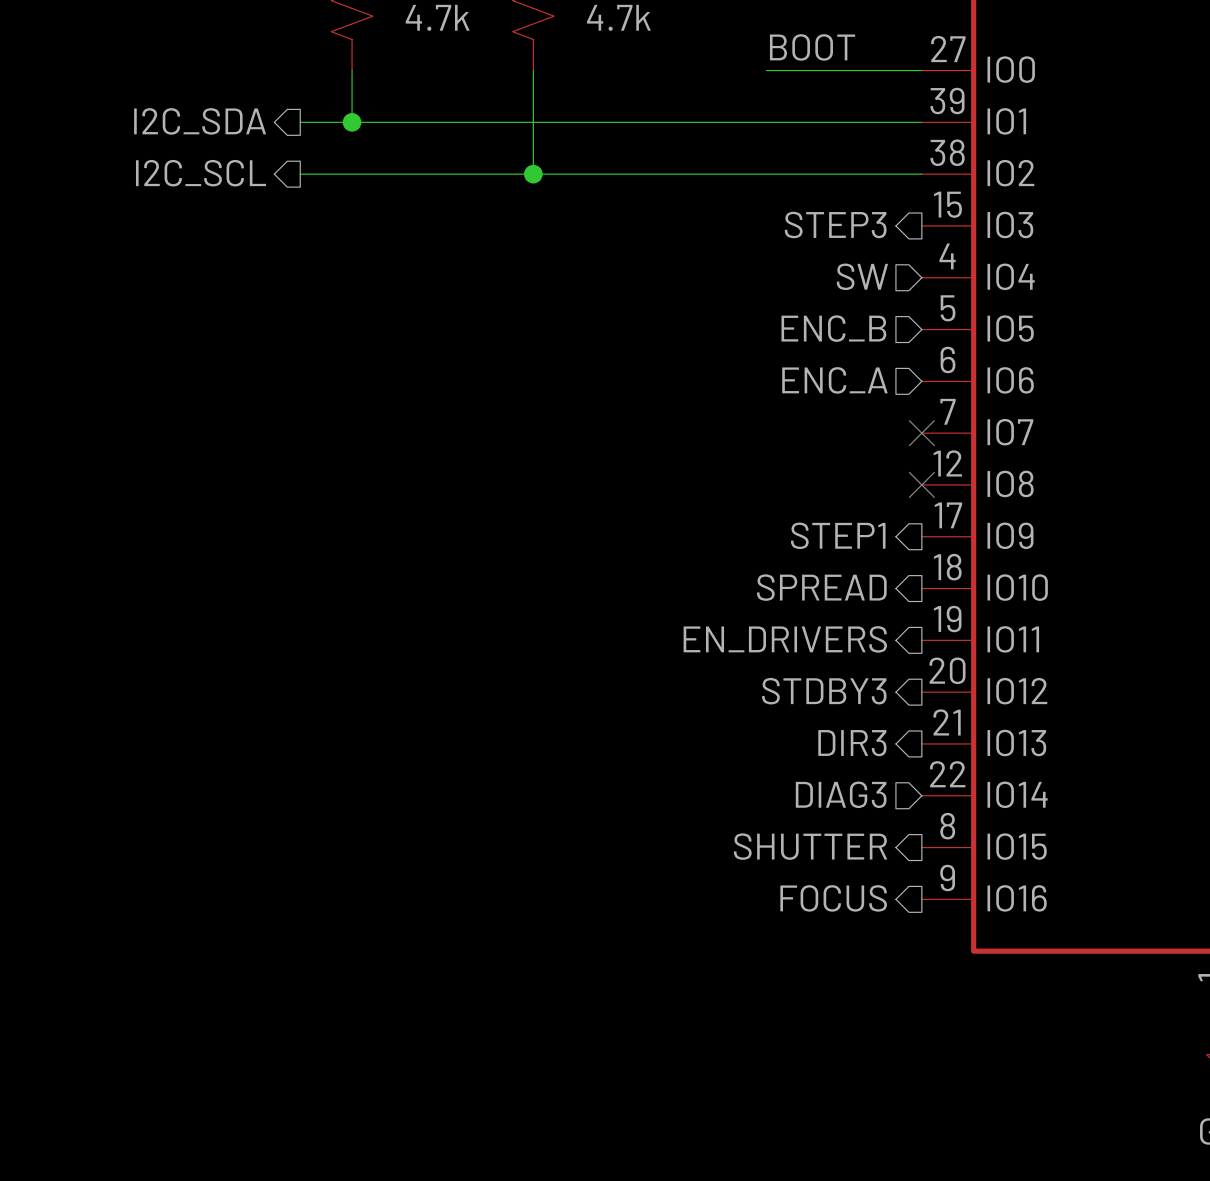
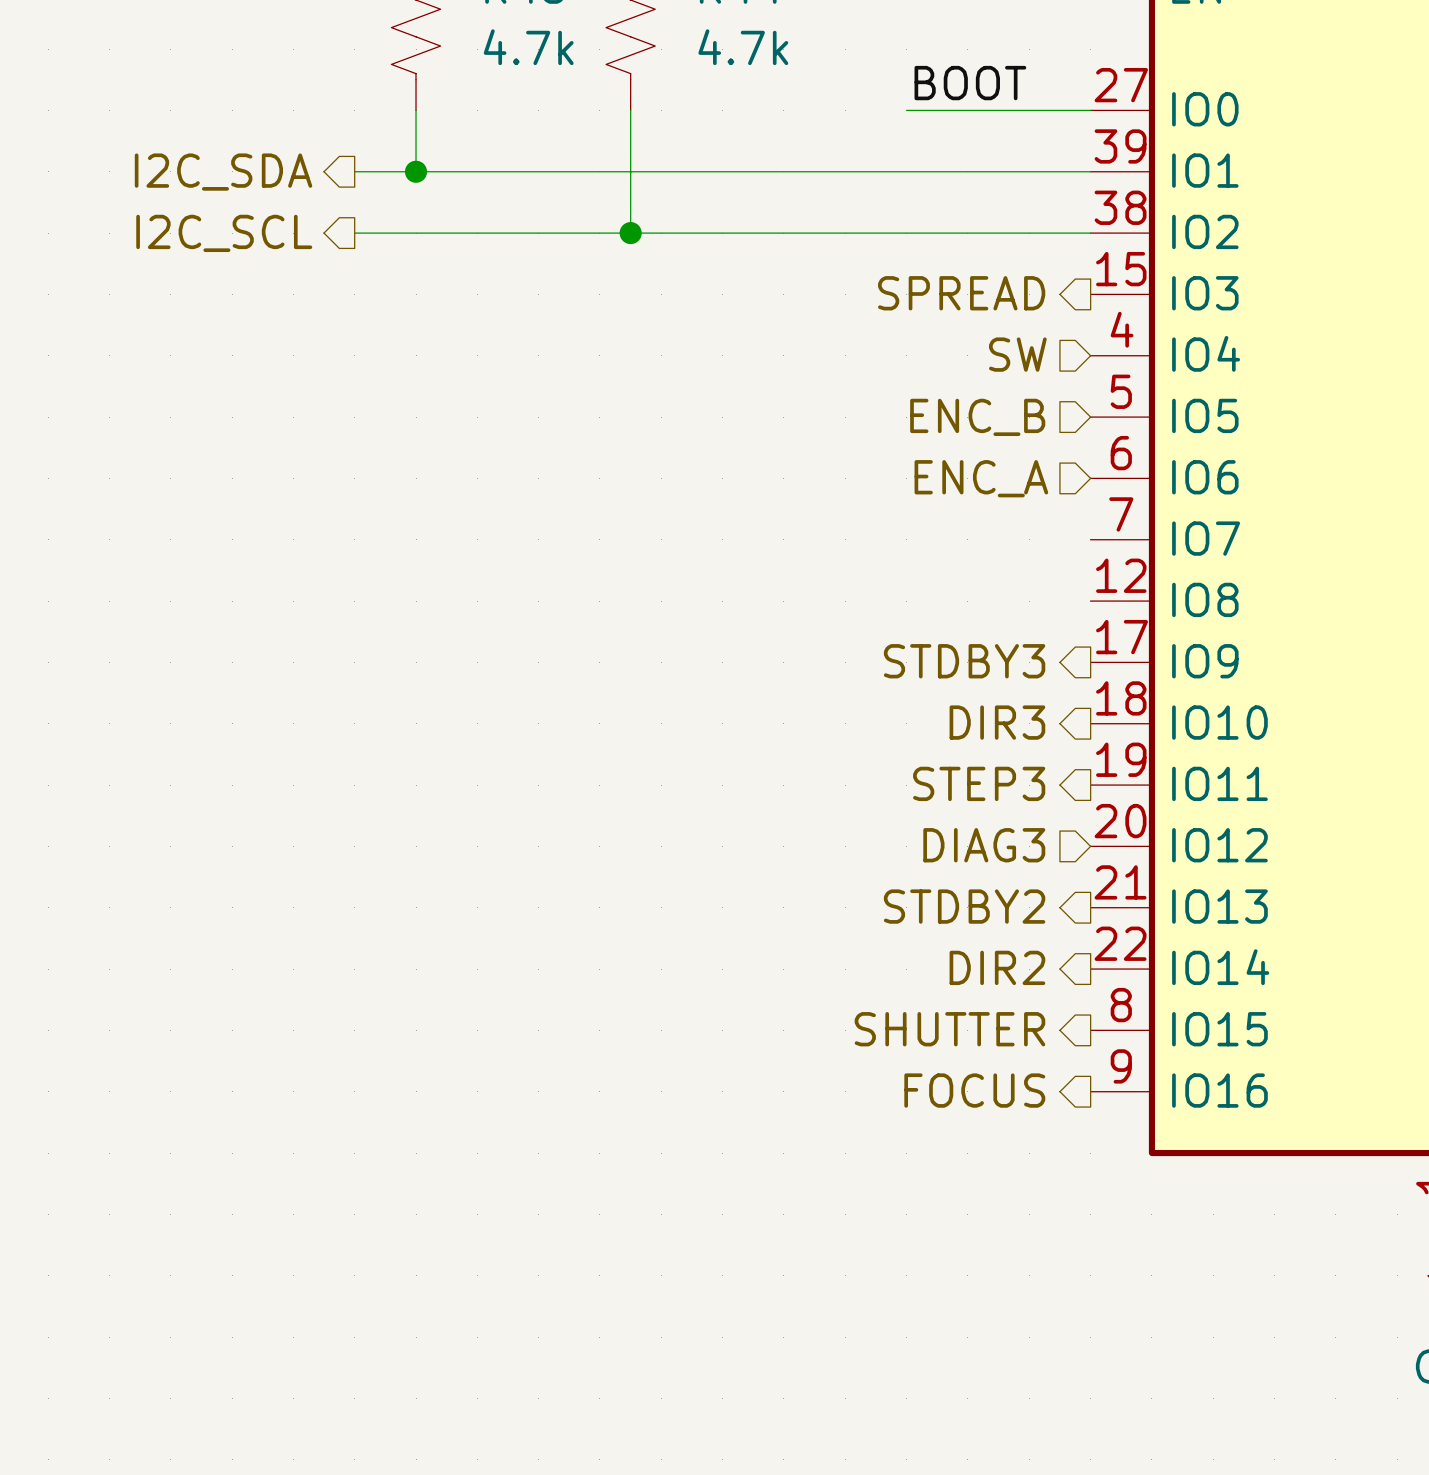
hierarchical label: STEP3 (835, 224) -> SPREAD (961, 293)
no-connect mark: (921, 433) -> none
no-connect mark: (921, 484) -> none
hierarchical label: STEP1 (838, 535) -> STDBY3 (964, 661)
hierarchical label: SPREAD (821, 587) -> DIR3 (997, 722)
hierarchical label: EN_DRIVERS (785, 639) -> STEP3 (979, 783)
hierarchical label shape: output (824, 691) -> input (984, 845)
hierarchical label: STDBY3 (824, 691) -> DIAG3 (984, 845)
hierarchical label: DIR3 (852, 743) -> STDBY2 (964, 906)
hierarchical label shape: input (841, 794) -> output (997, 967)
hierarchical label: DIAG3 (841, 794) -> DIR2 (997, 967)

